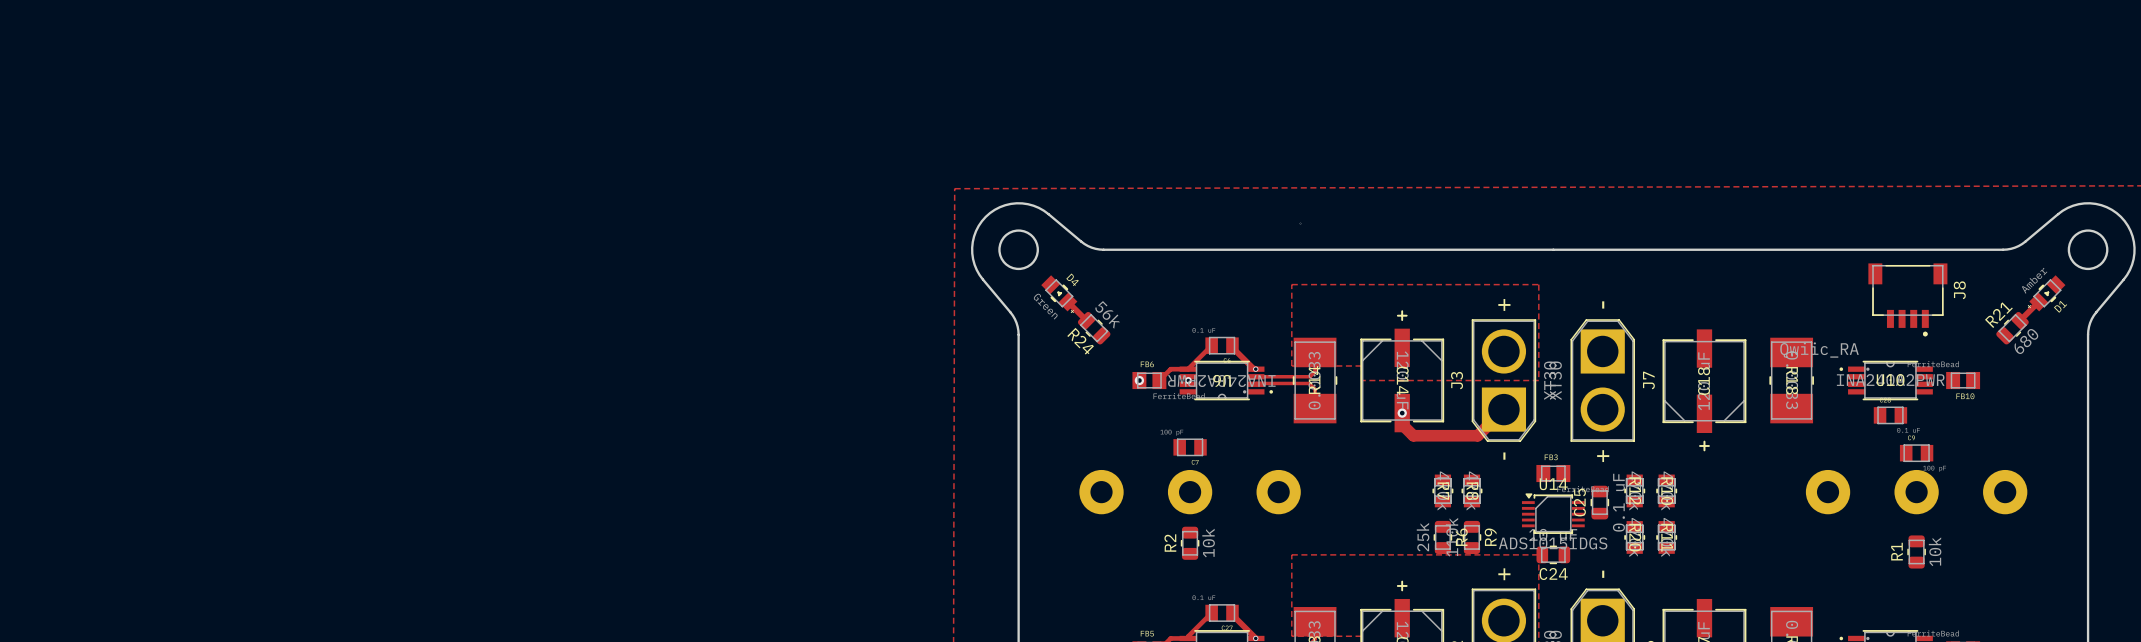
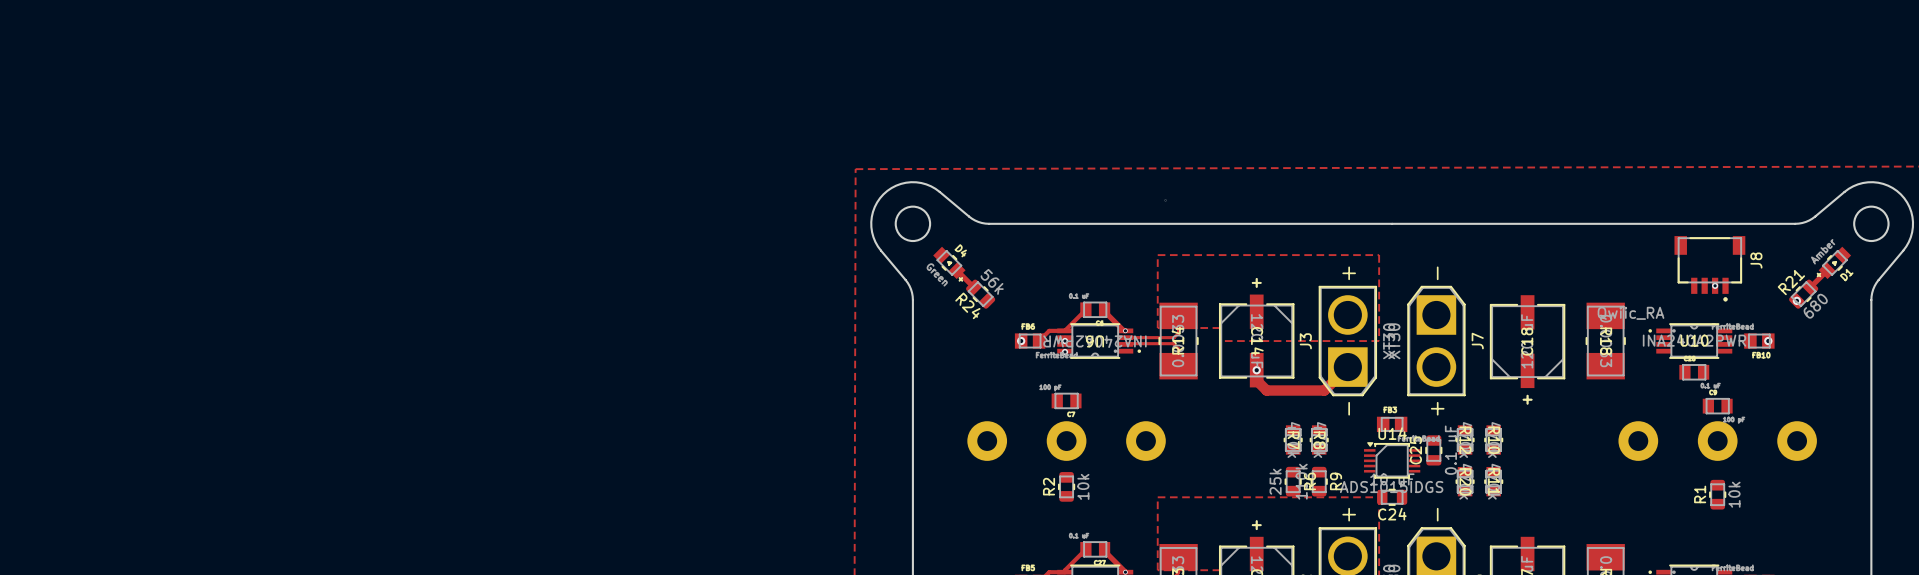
via: none -> (1715, 285)
via: none -> (1796, 300)
via: none -> (1768, 341)
via: none -> (1065, 352)

